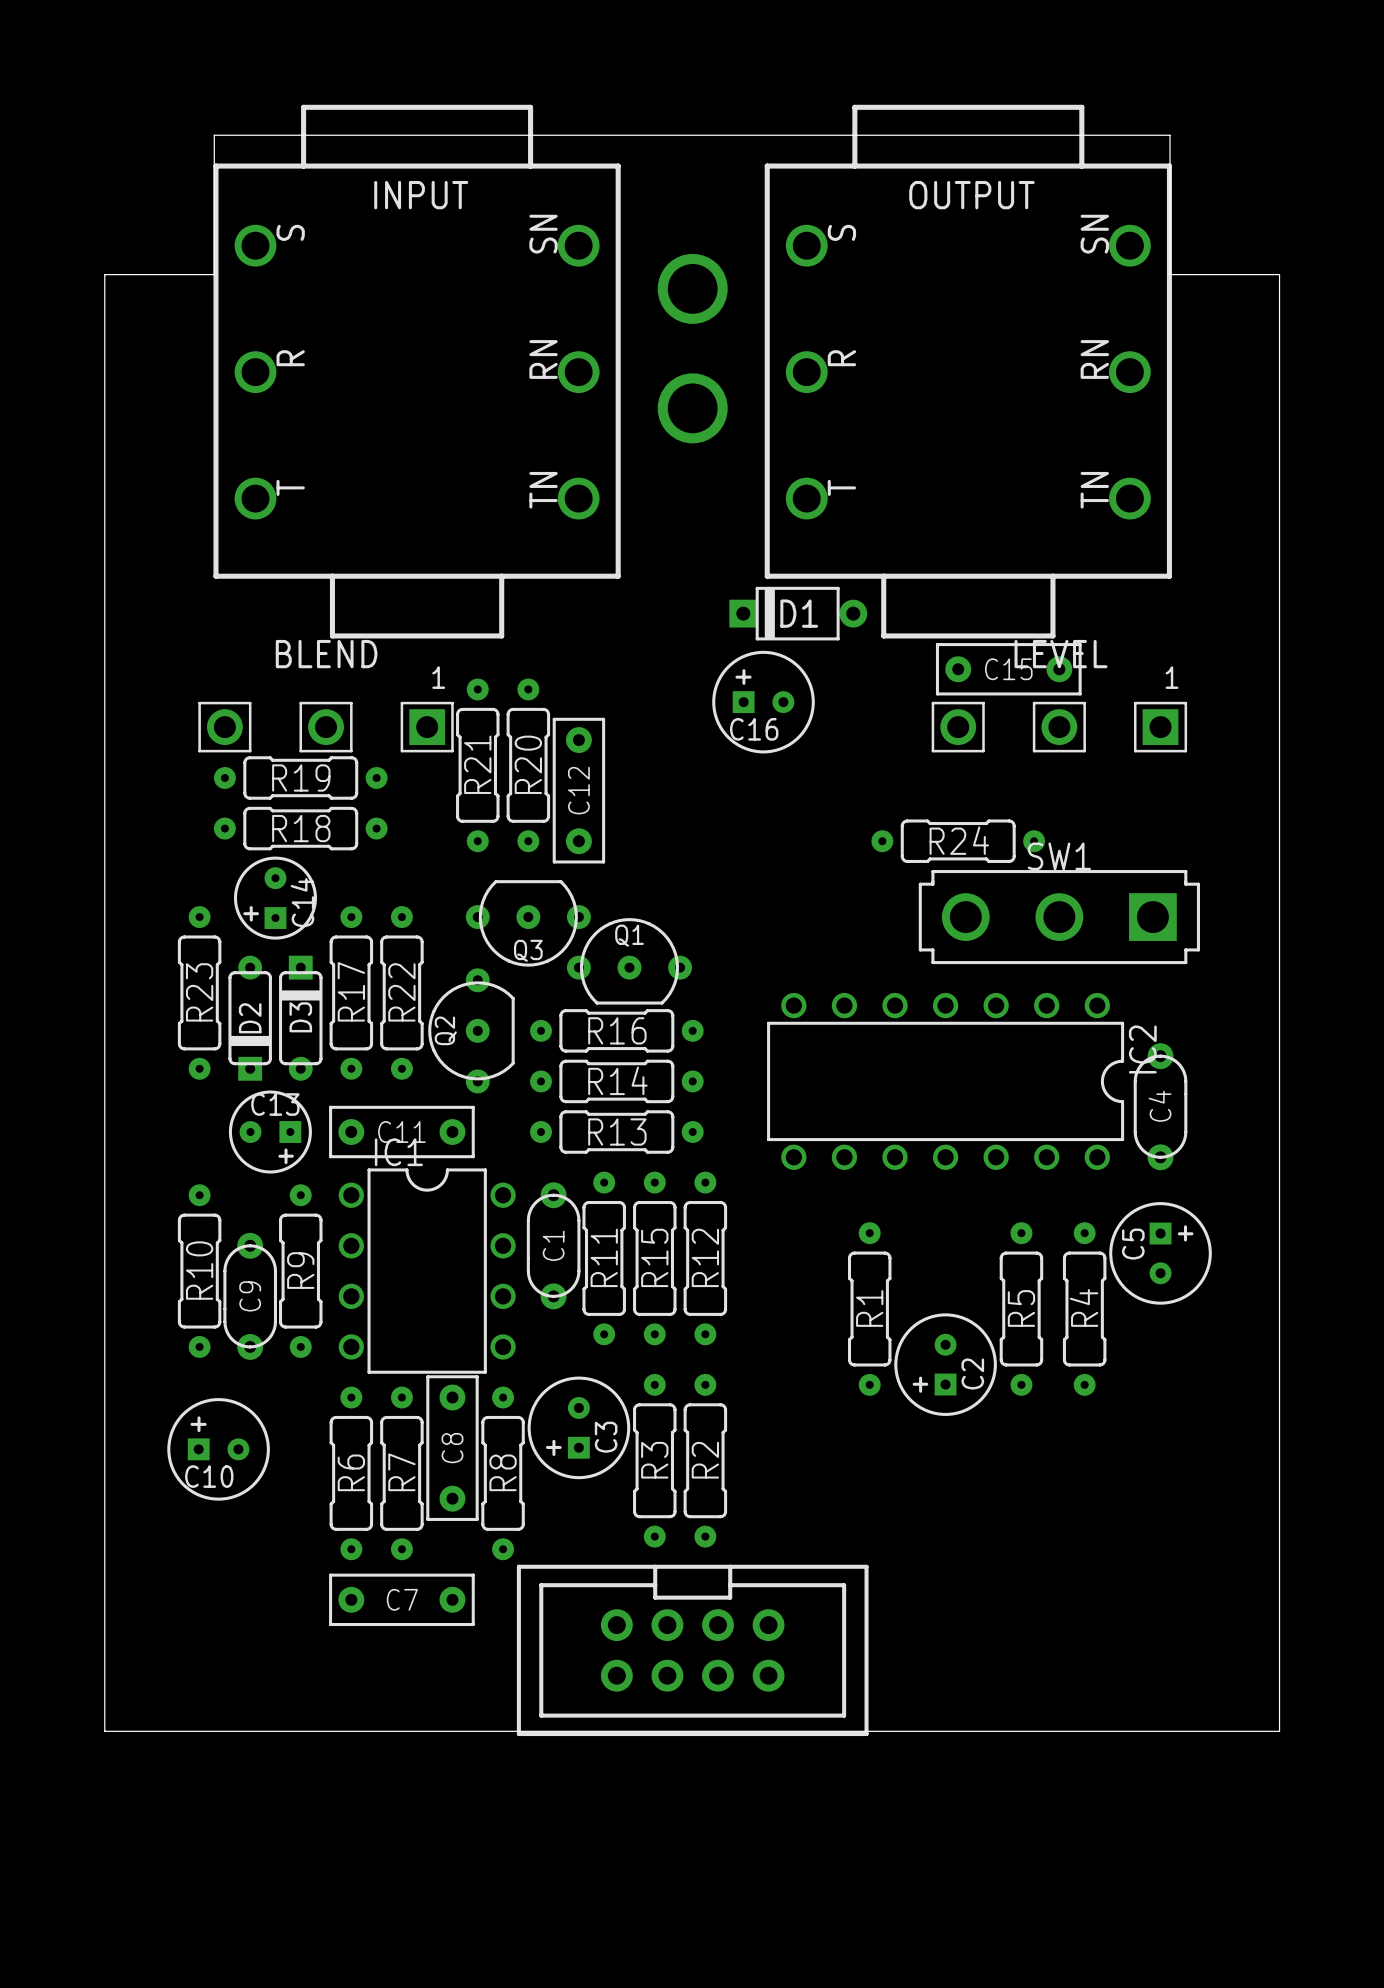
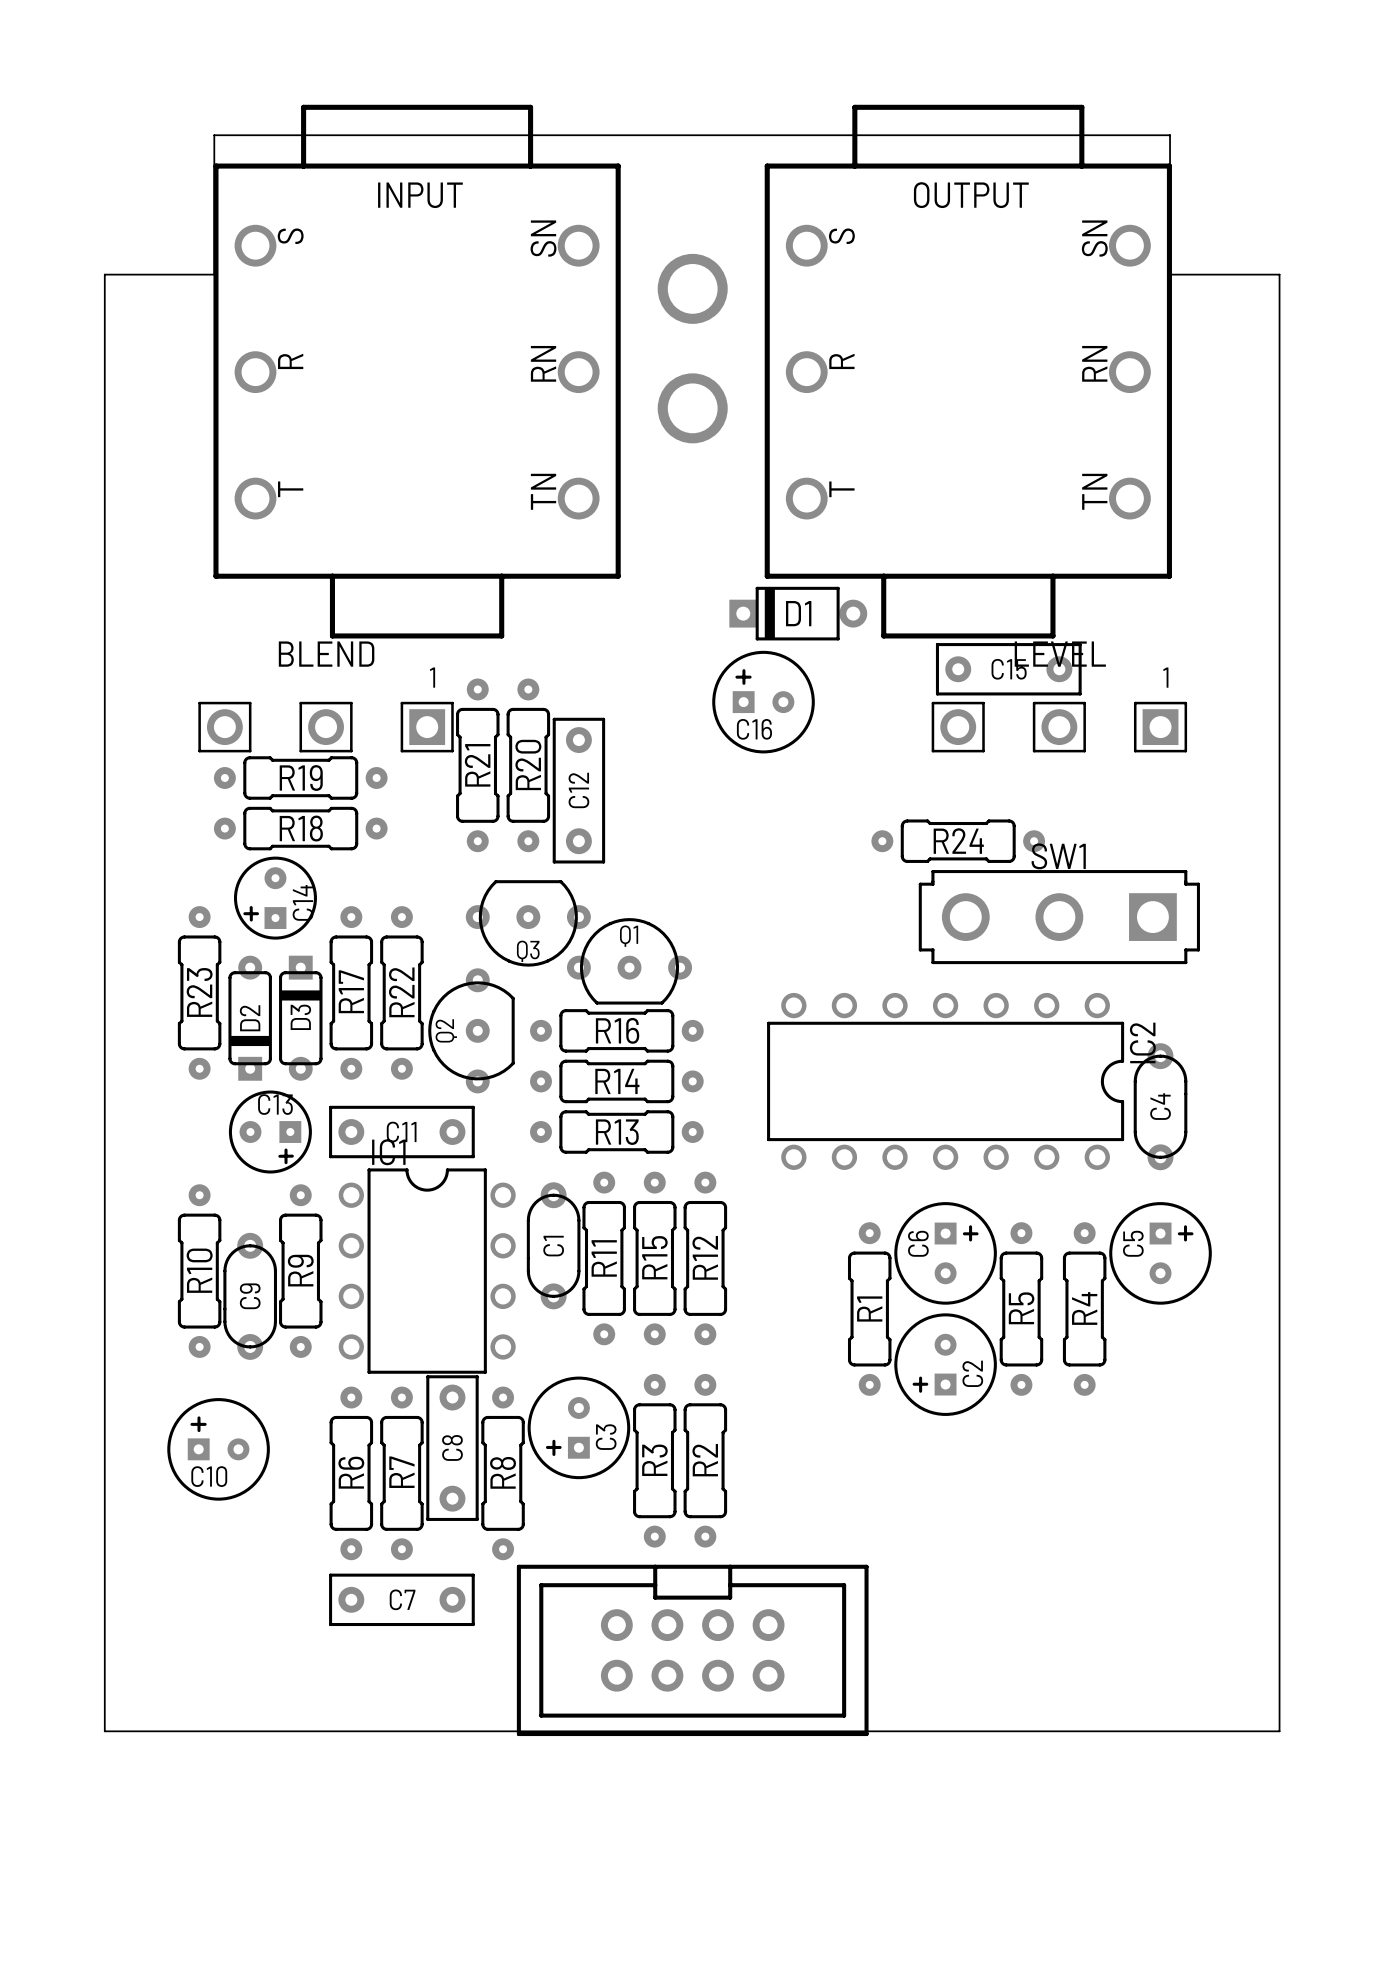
C6: none -> (945, 1253)

